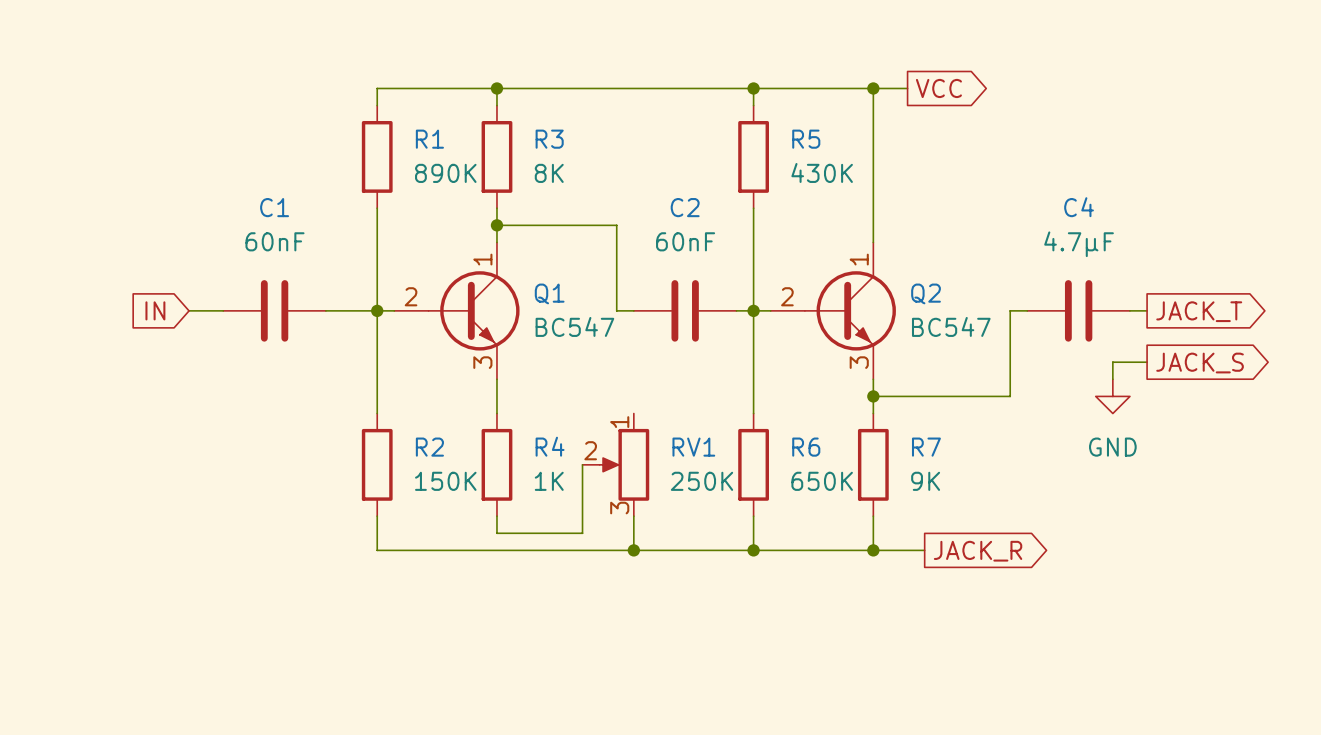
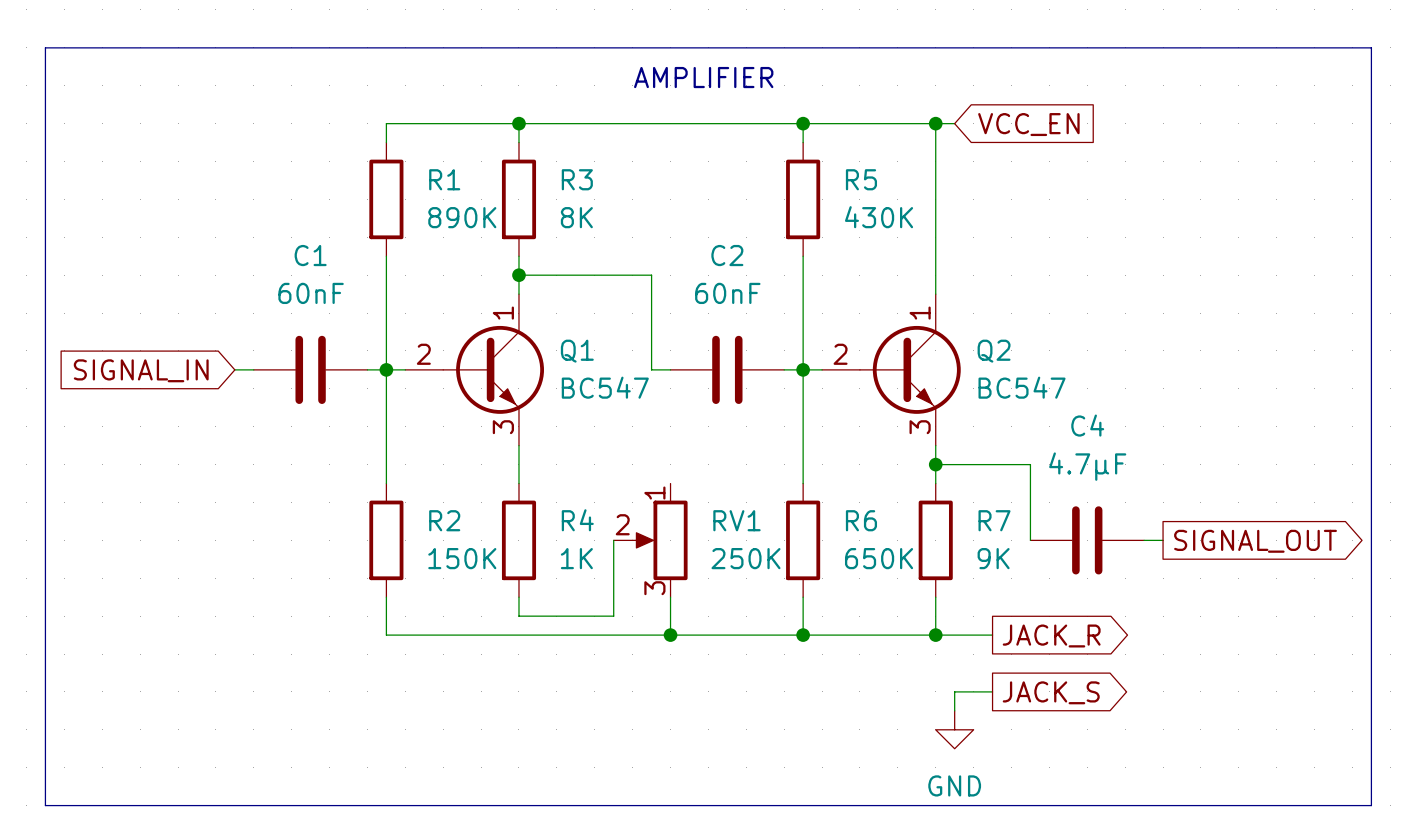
line: none -> (45, 47) (1371, 47) (1371, 805) (45, 805) (45, 47)
text: none -> AMPLIFIER (703, 77)
wire: (890, 88) (907, 88) -> none
global label shape: output (938, 88) -> input (1028, 124)
global label: VCC (938, 88) -> VCC_EN (1028, 124)
global label: IN (155, 310) -> none
wire: (189, 310) (223, 310) -> none
C1 position: (274, 310) -> (310, 369)
wire: (1027, 310) (1010, 310) (1010, 396) (958, 396) -> (1030, 540) (1030, 464)
C4 position: (1078, 310) -> (1087, 540)
wire: (1129, 310) (1147, 310) -> (1144, 540) (1163, 540)
global label: none -> SIGNAL_IN (141, 370)
global label: JACK_T (1199, 311) -> none
wire: (1147, 362) (1112, 362) (1112, 379) -> (992, 691) (954, 691) (954, 710)
global label position: JACK_S (1200, 363) -> JACK_S (1051, 692)
power symbol position: GND (1112, 396) -> GND (954, 729)
global label: none -> SIGNAL_OUT (1255, 541)

